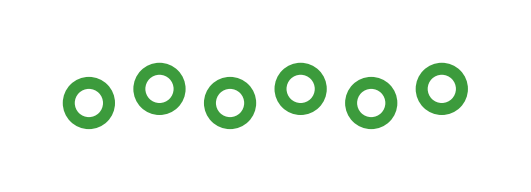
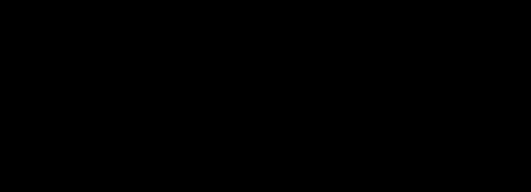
part: (265, 95) -> none

